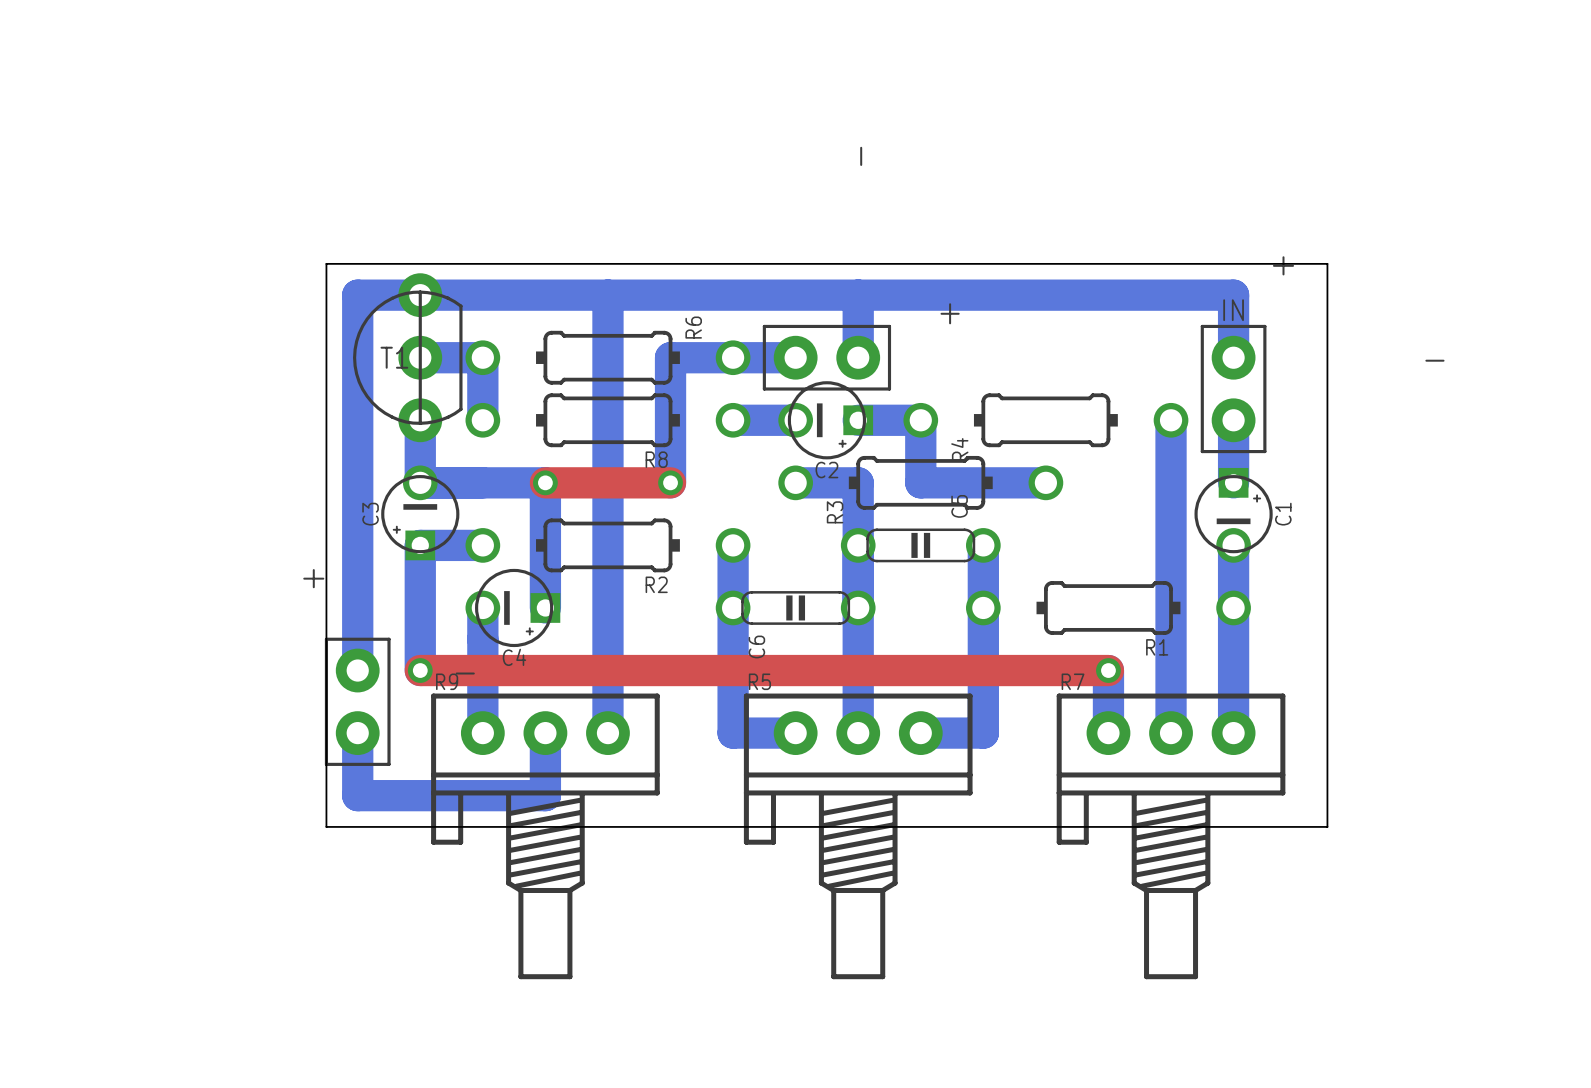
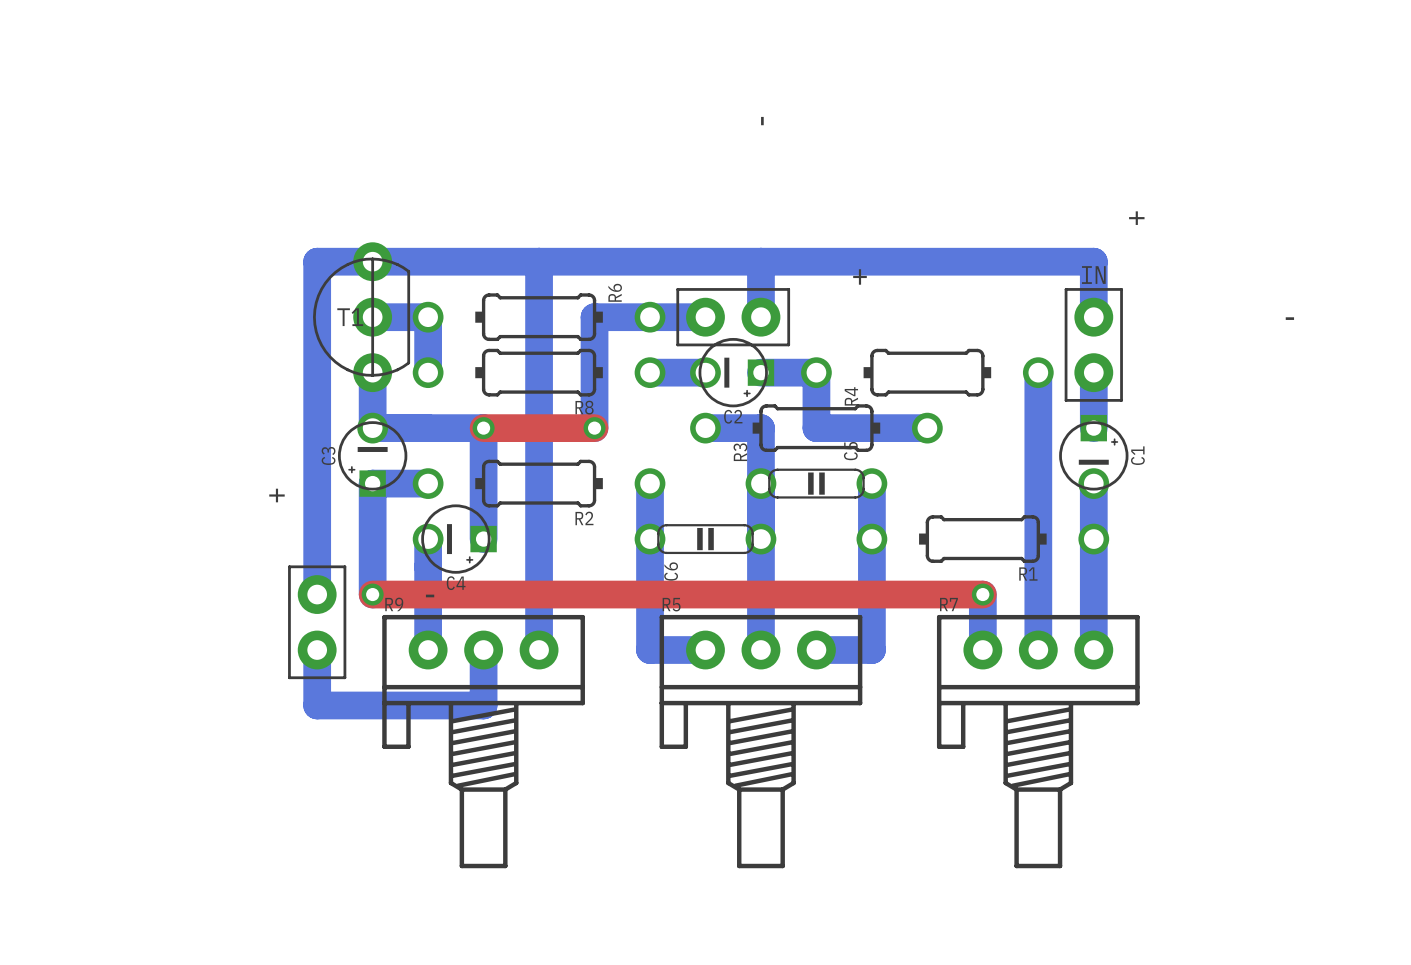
board edge: (326, 263) (1327, 263) (1327, 826) (326, 826) (326, 263) -> none

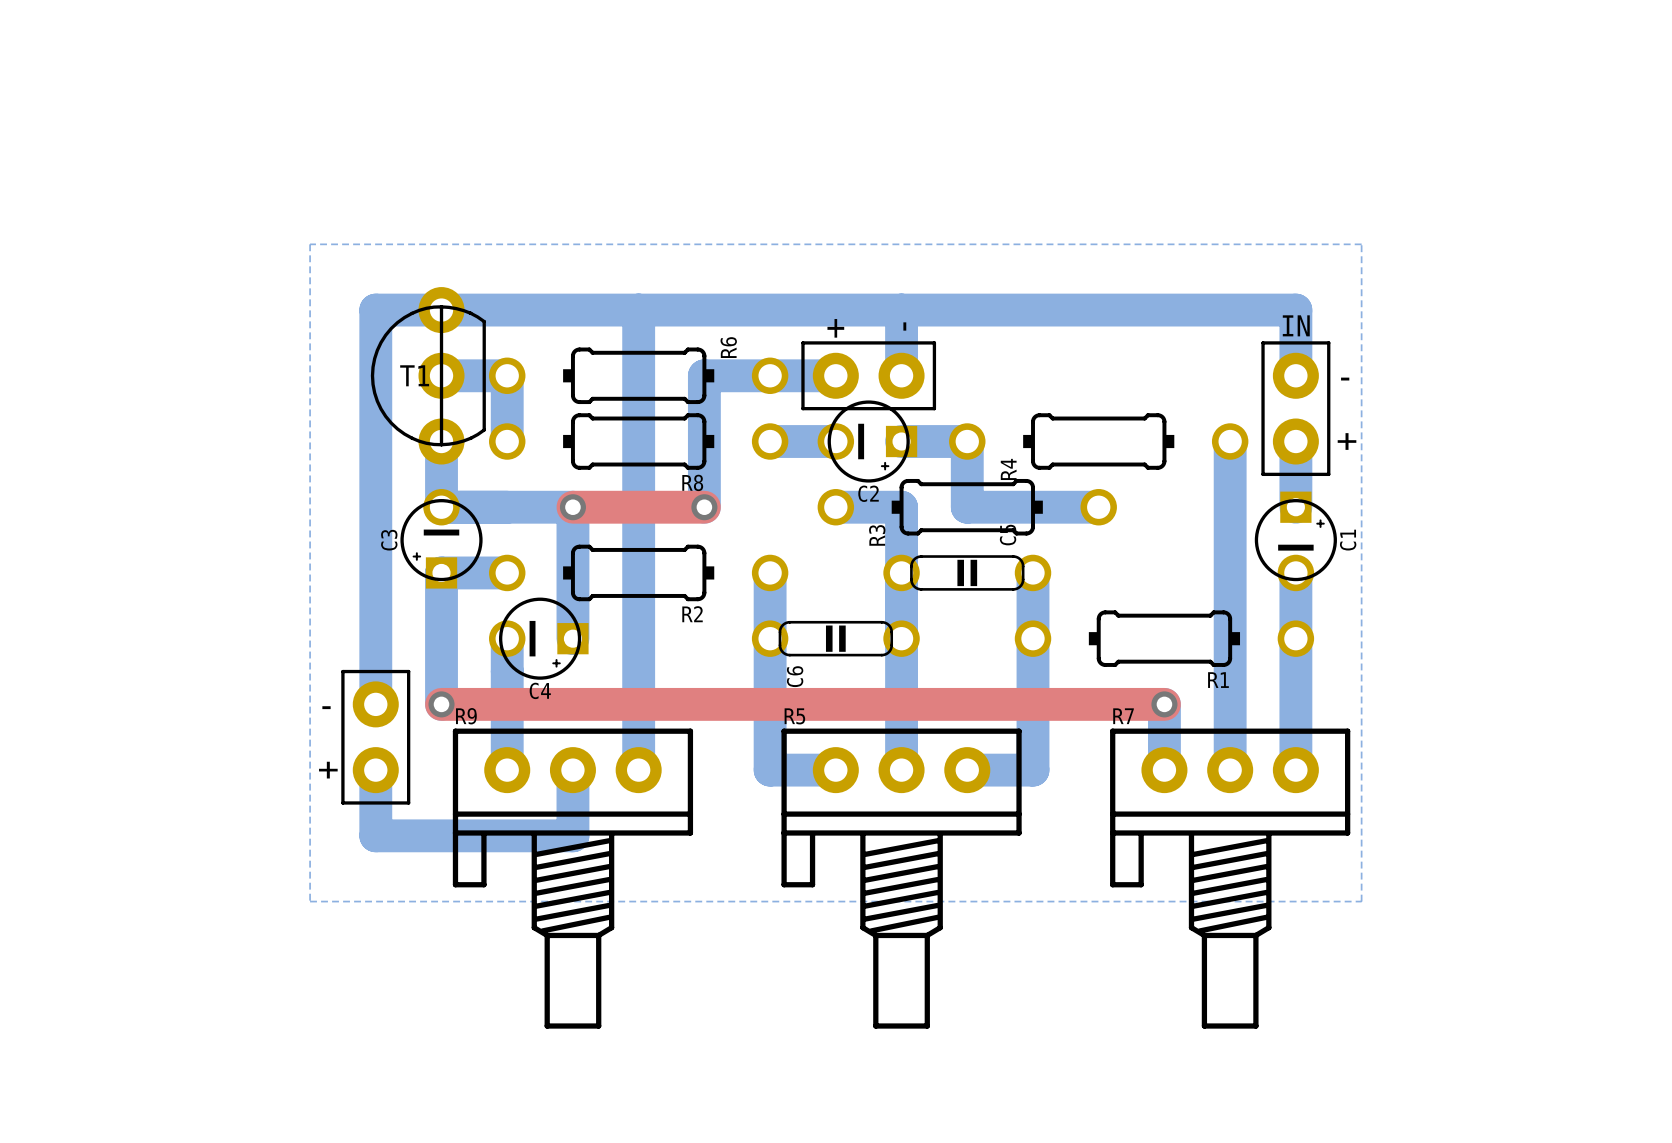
bottom zone outline: none -> (310, 244) (310, 901) (1361, 901) (1361, 244) (310, 244)
part footprint: [676, 288, 791, 347] -> [801, 341, 937, 411]
IN footprint: [1064, 288, 1123, 402] -> [1261, 341, 1331, 477]
part footprint: [288, 565, 347, 680] -> [341, 669, 411, 805]

